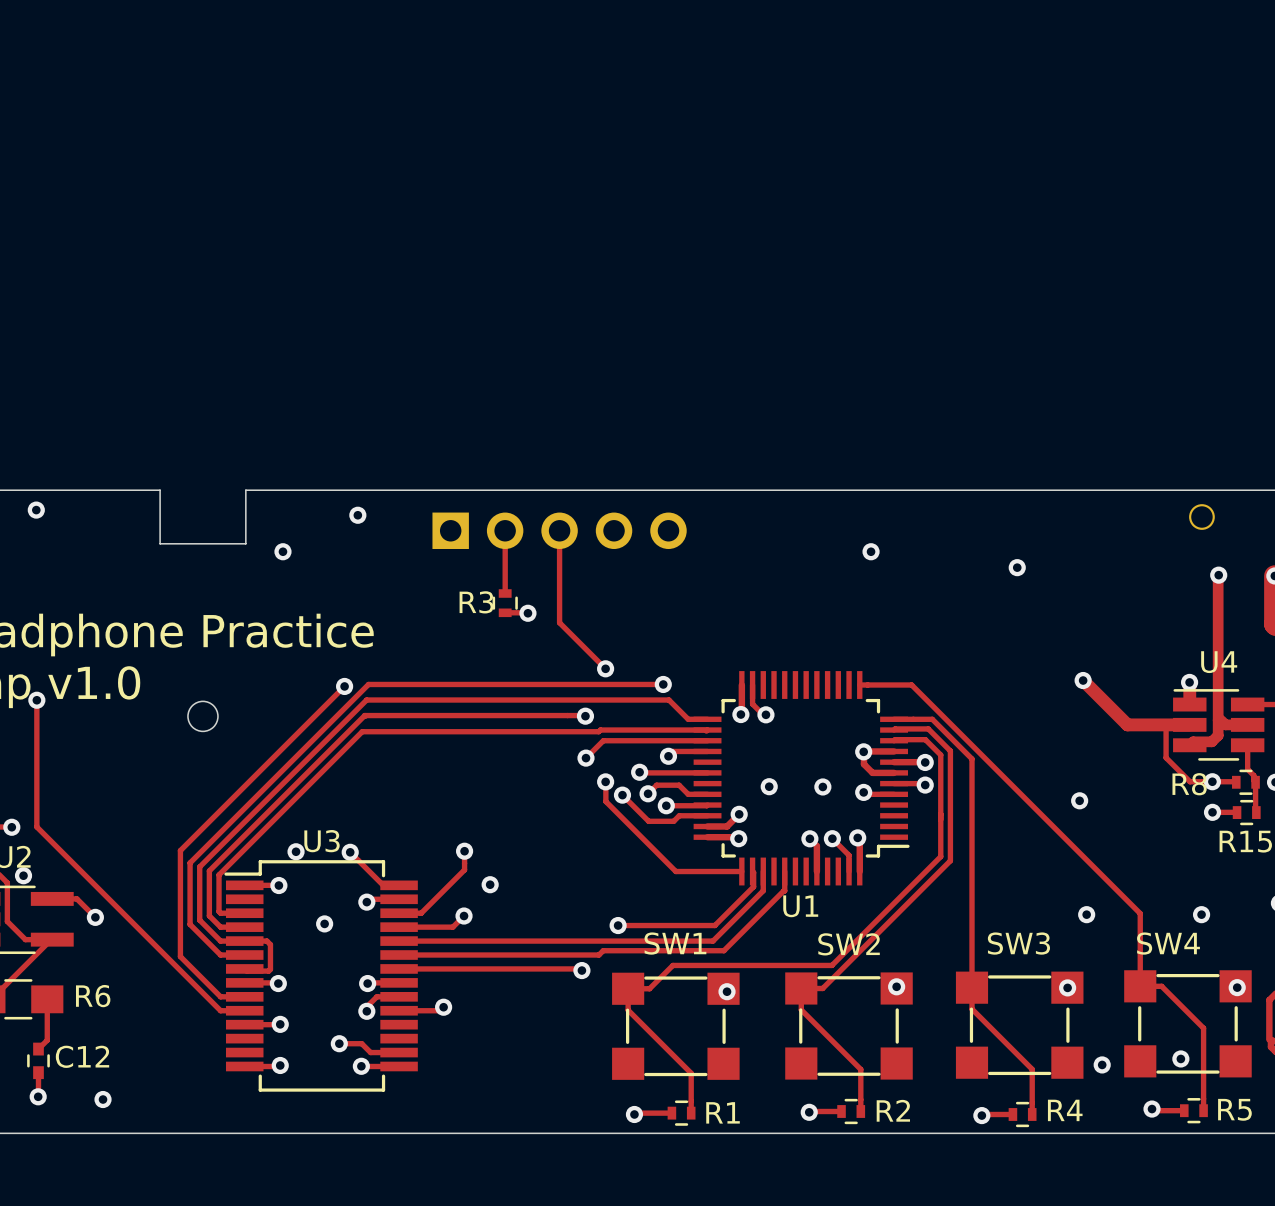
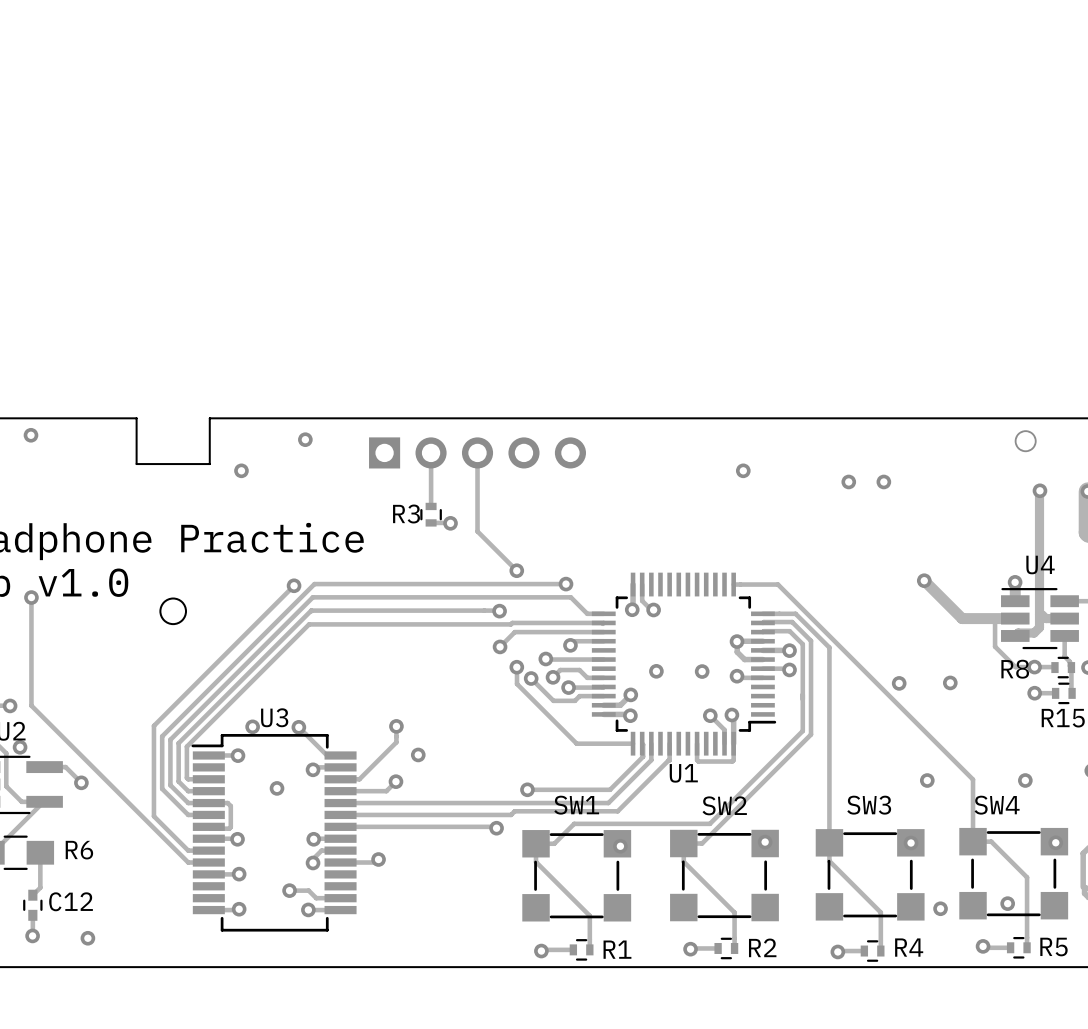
via: none -> (848, 481)
via: none -> (883, 481)
via: (1017, 567) -> none
via: none -> (899, 683)
via: (1079, 800) -> none
via: none -> (950, 682)
track: (809, 838) (816, 845) (816, 871) -> (733, 743) (732, 761) (698, 761) (697, 743)
via: (809, 838) -> none

